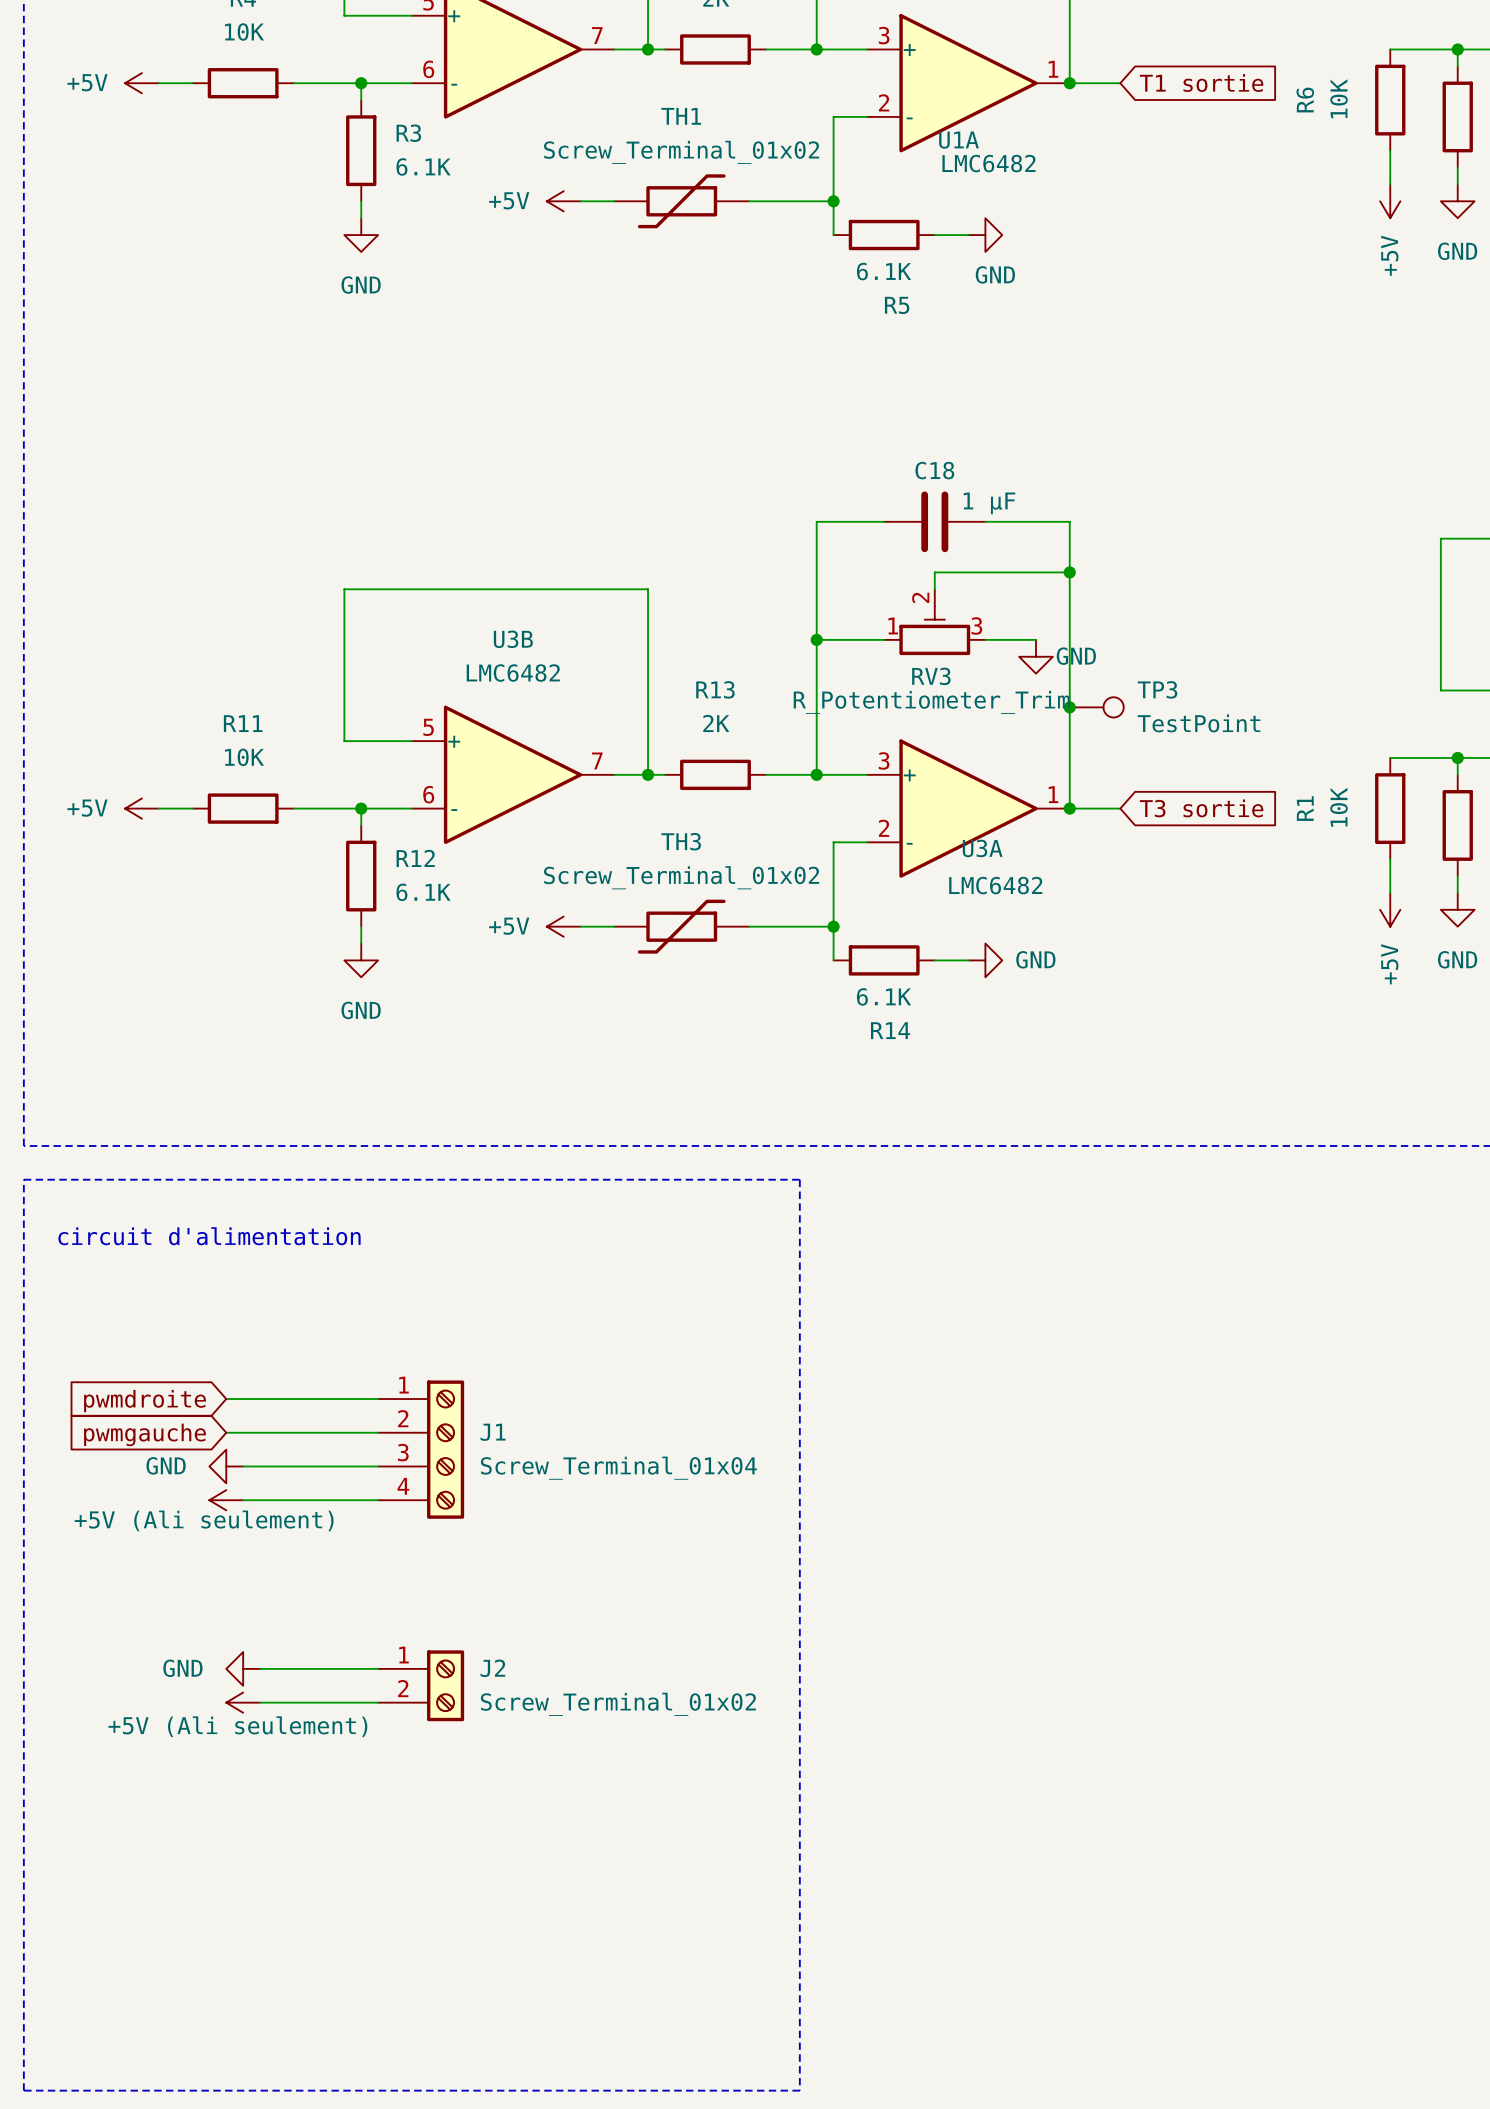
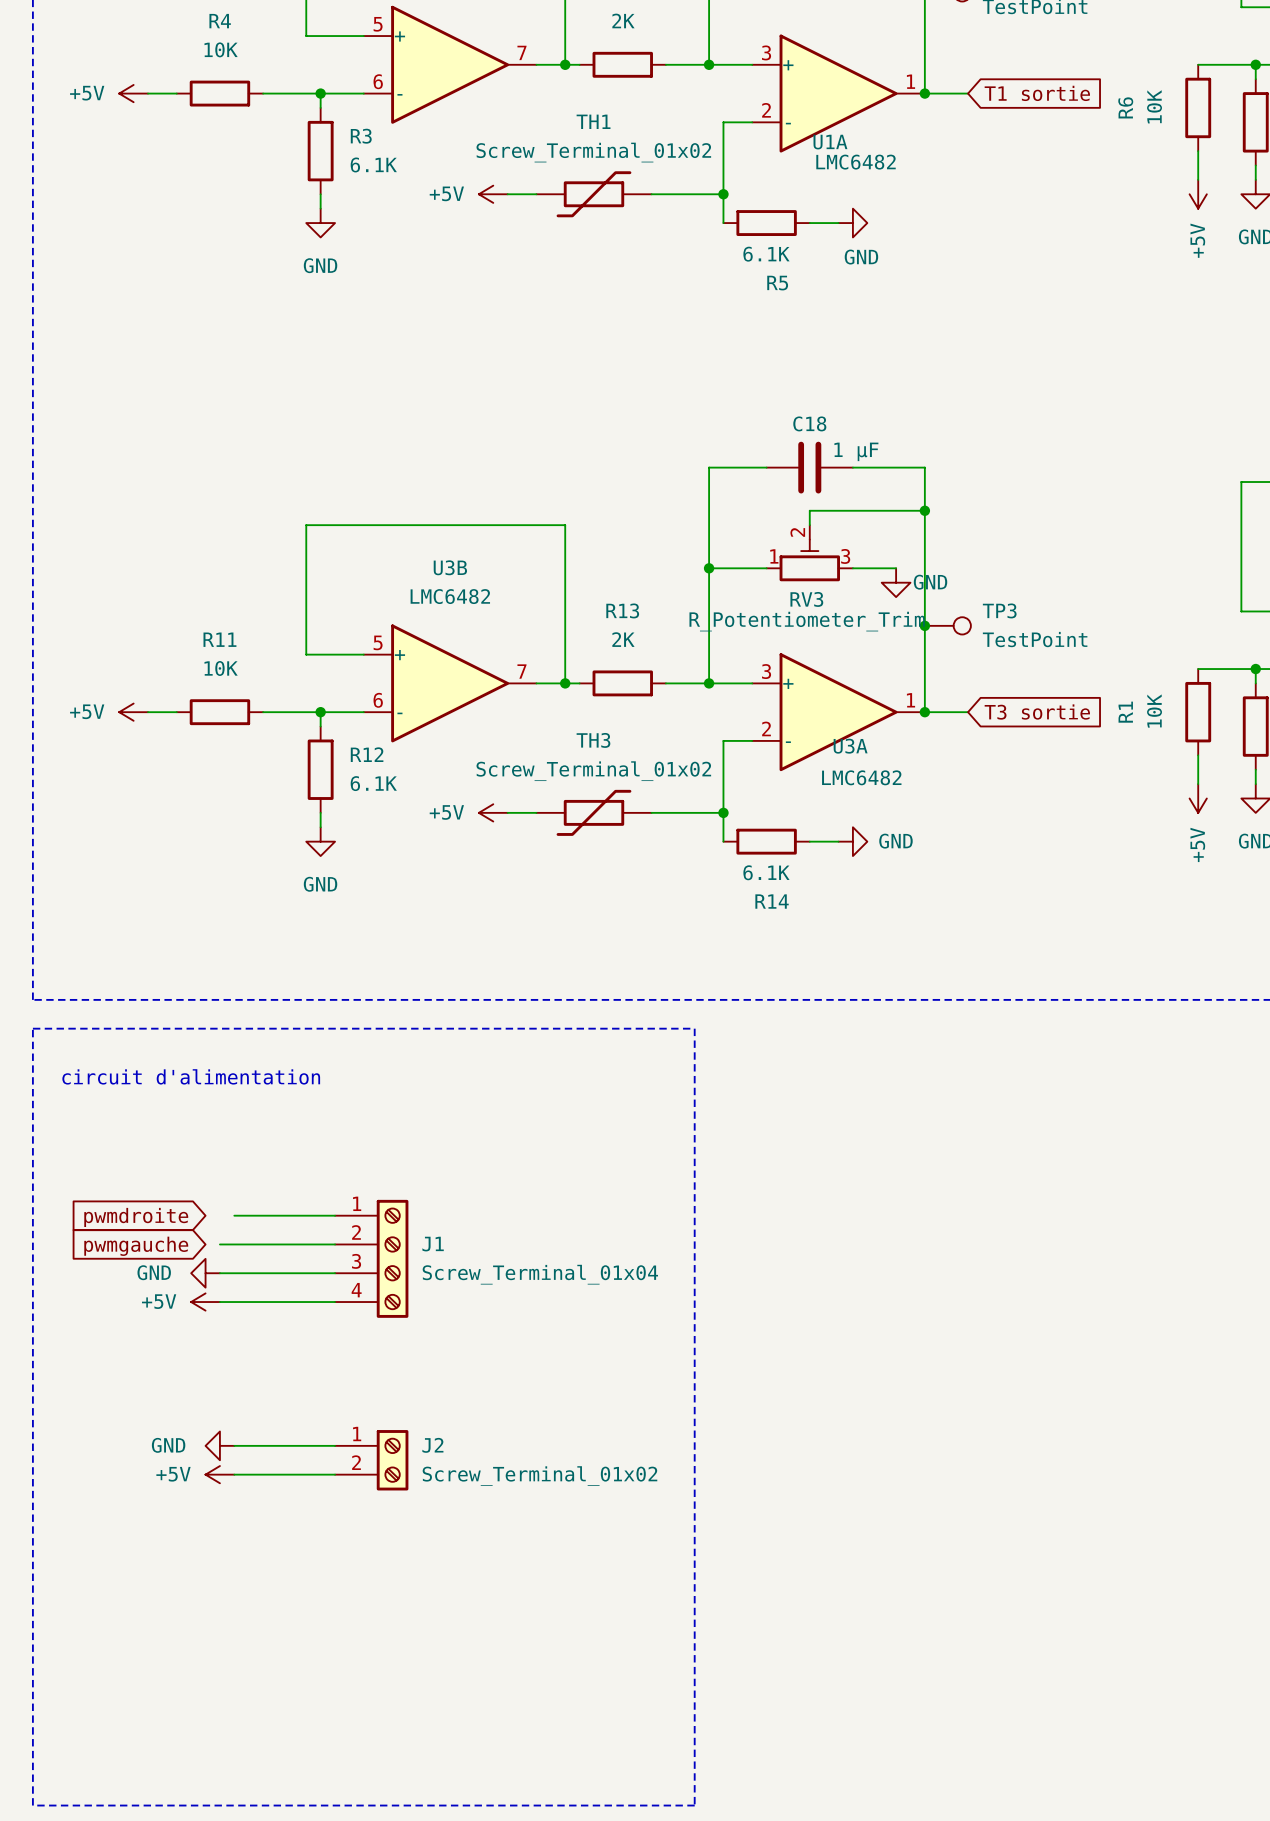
wire: (226, 1399) (260, 1399) -> none
wire: (226, 1432) (243, 1432) -> none
power symbol: +5V (Ali seulement) (226, 1500) -> +5V (205, 1302)
power symbol: +5V (Ali seulement) (243, 1702) -> +5V (219, 1474)

